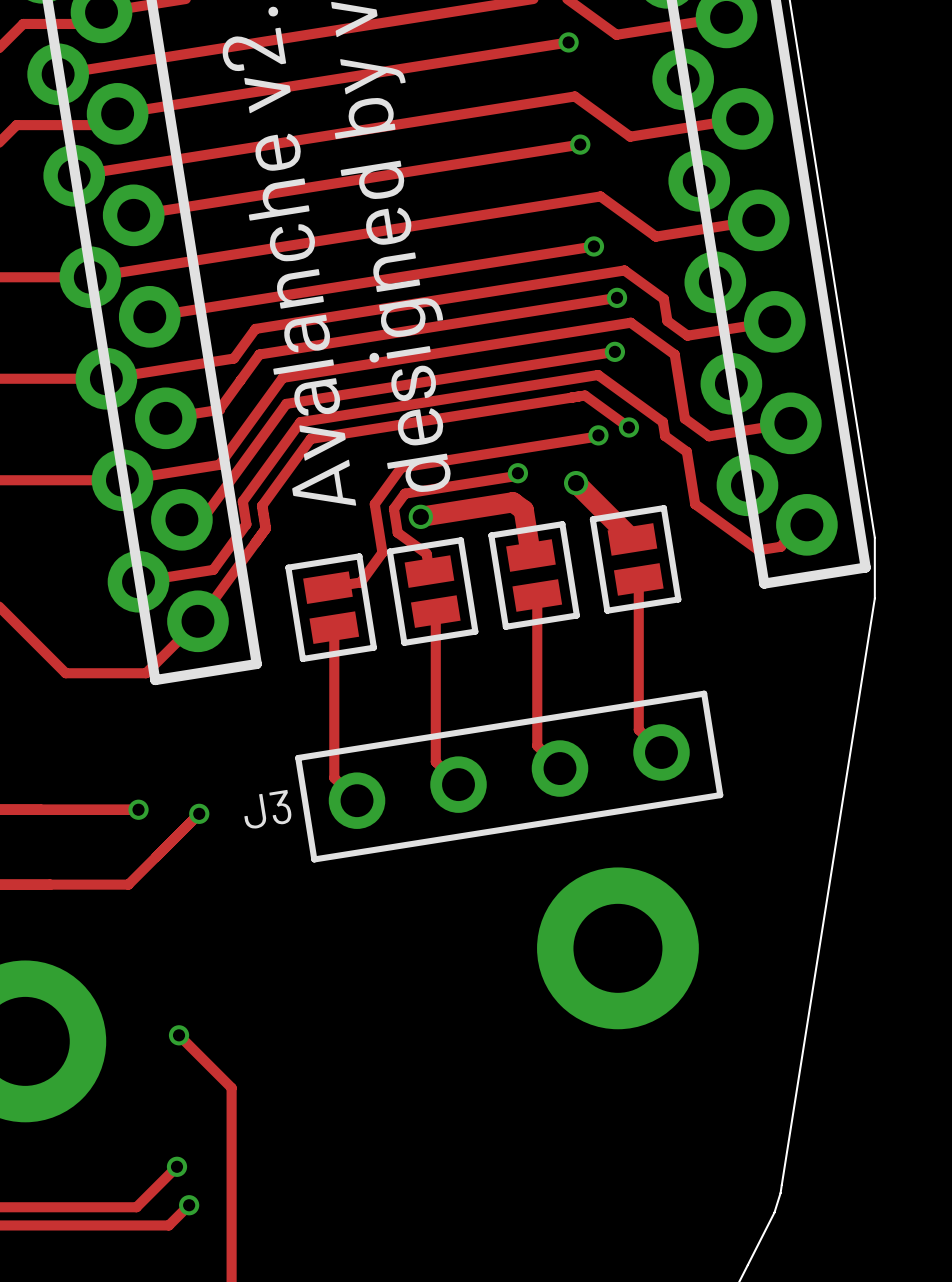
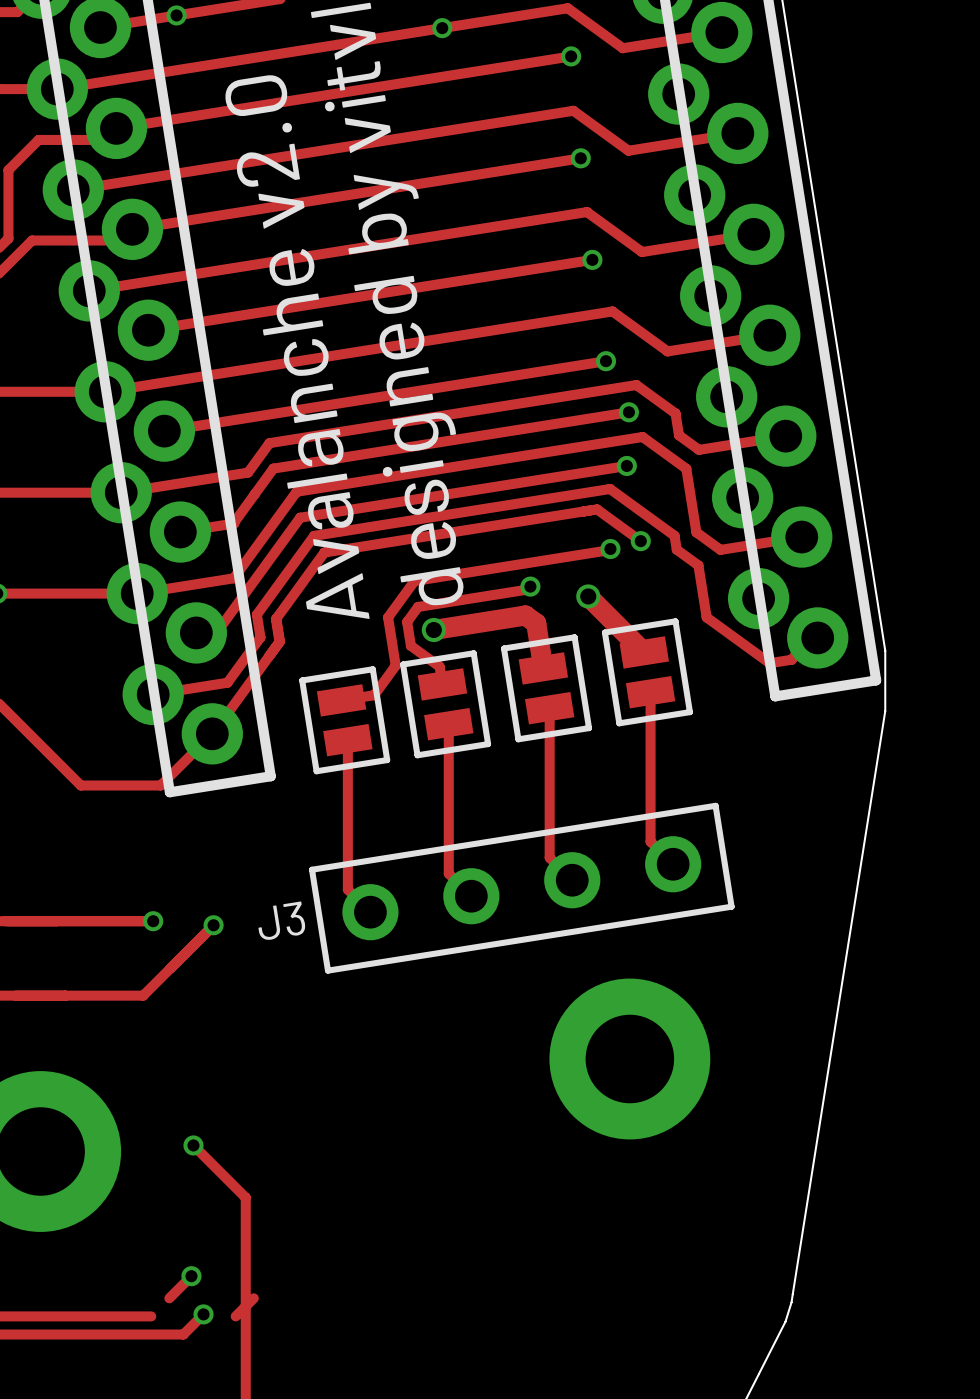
track: (154, 1189) (136, 1207) -> (253, 1298) (235, 1316)

